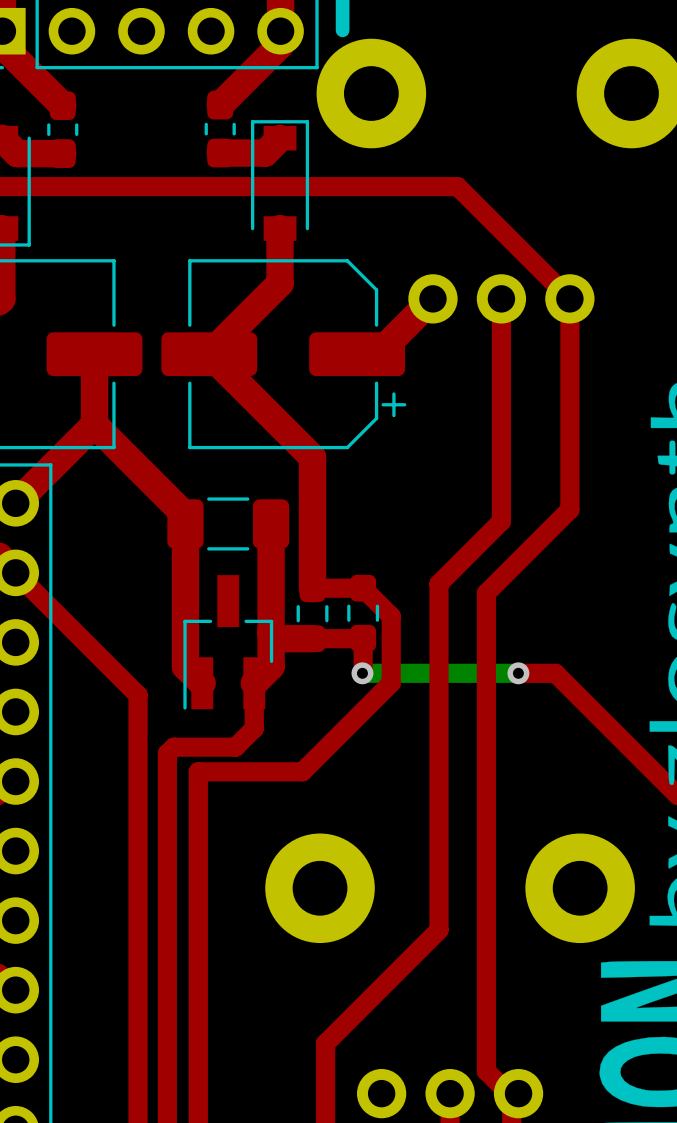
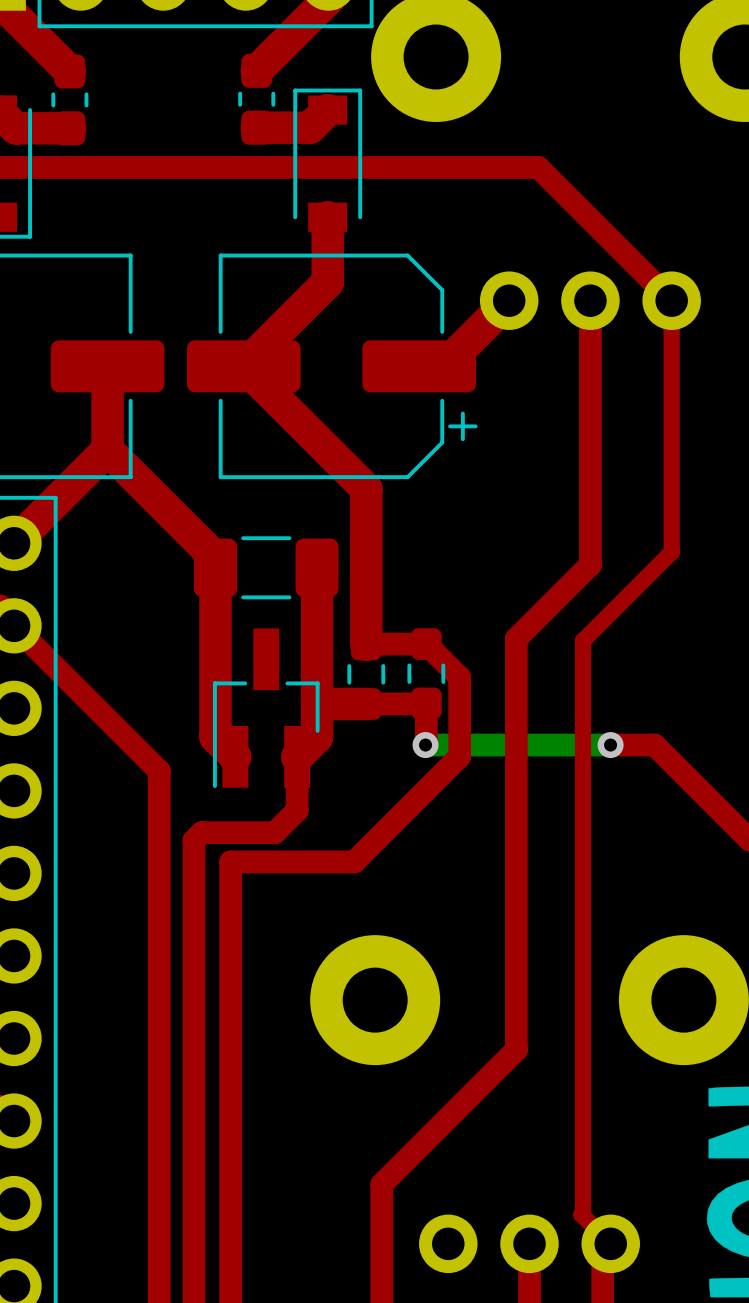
top track: (569, 298) (569, 509) (486, 593) (486, 1071) (508, 1093) (518, 1093) -> none
top track: none -> (582, 640) (581, 1214) (604, 1237)

